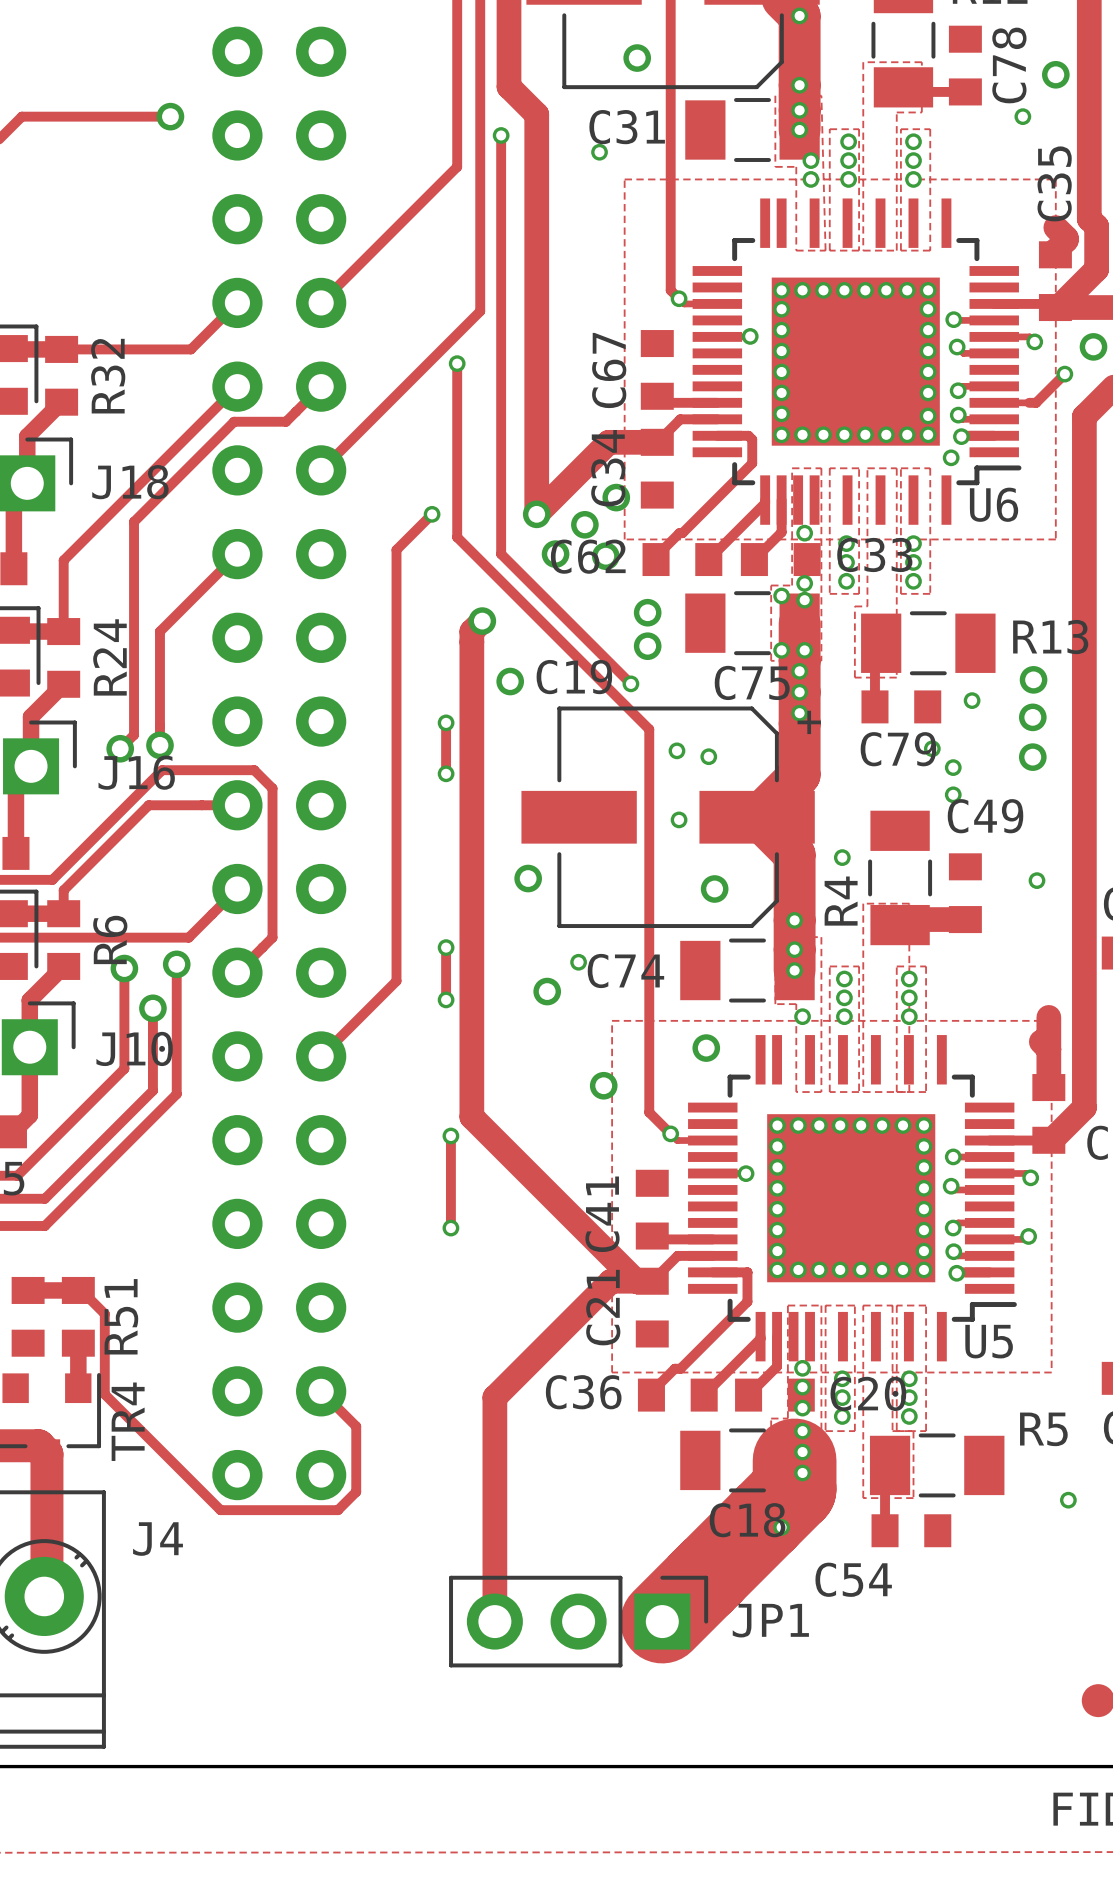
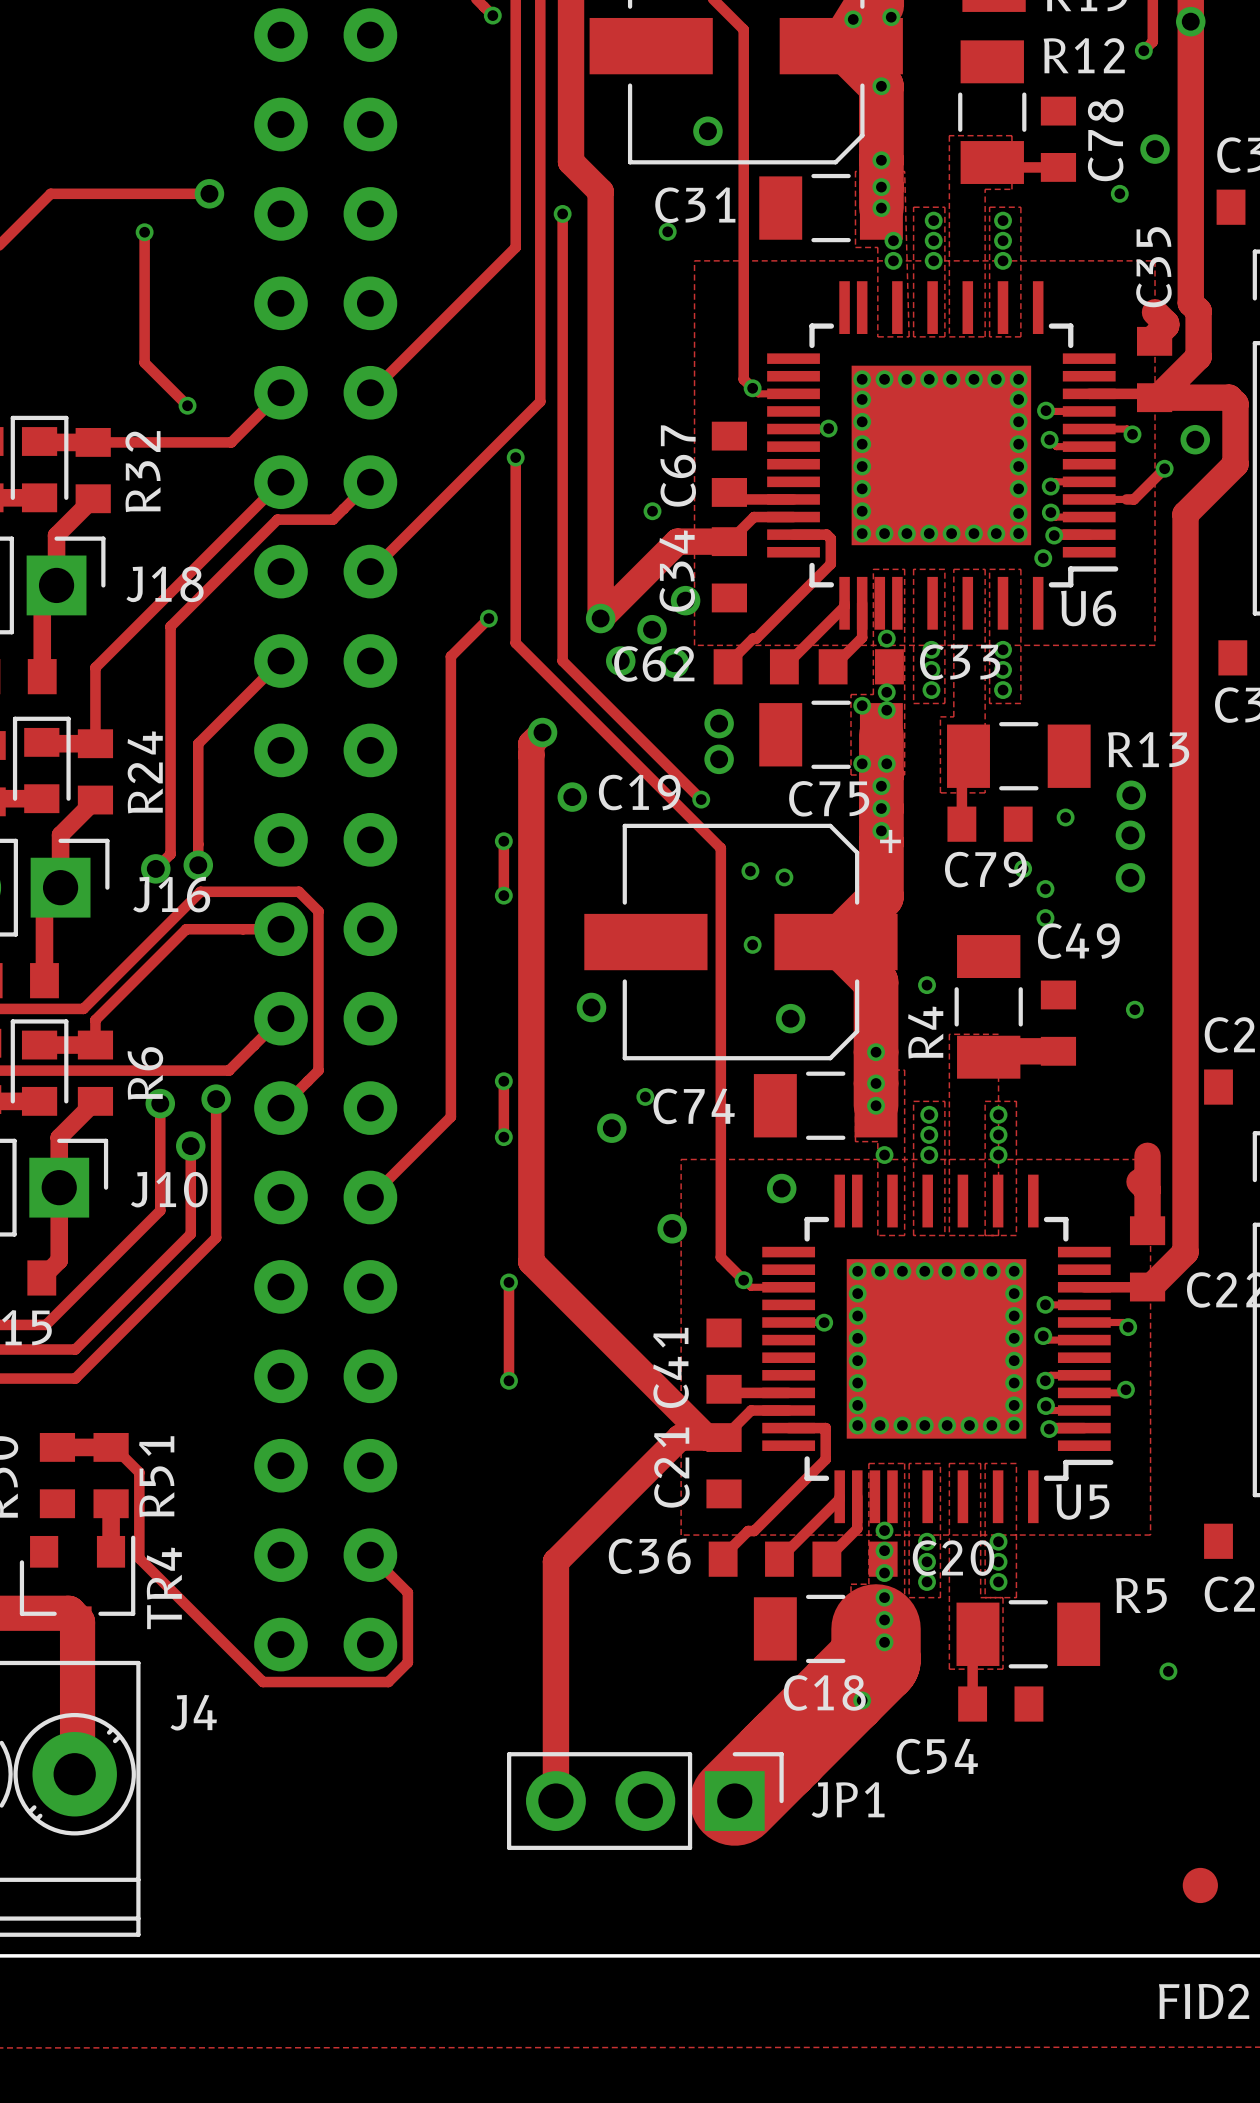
track: none -> (144, 232) (144, 362) (187, 405)
via: none -> (144, 232)
via: none -> (187, 405)
via: none -> (652, 511)

